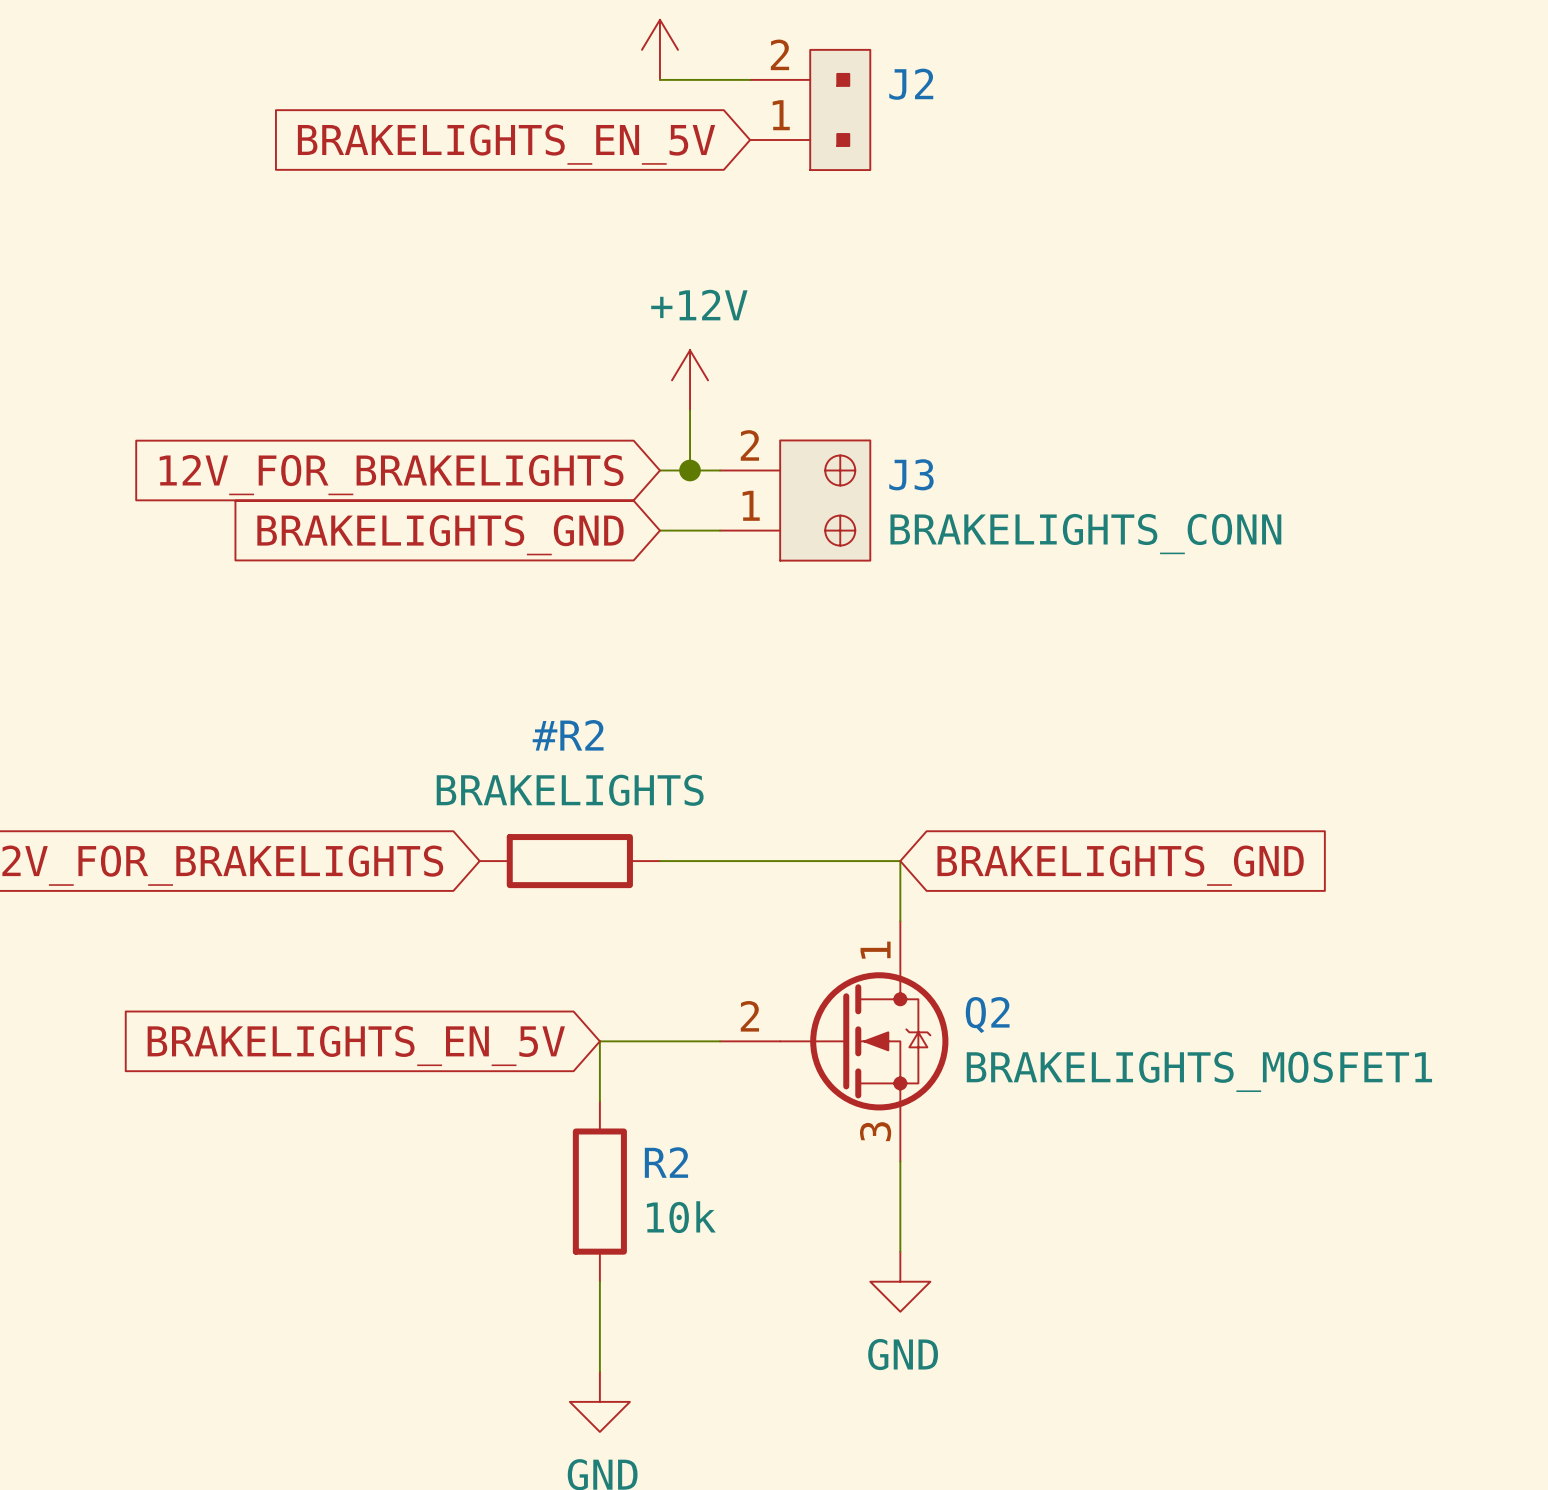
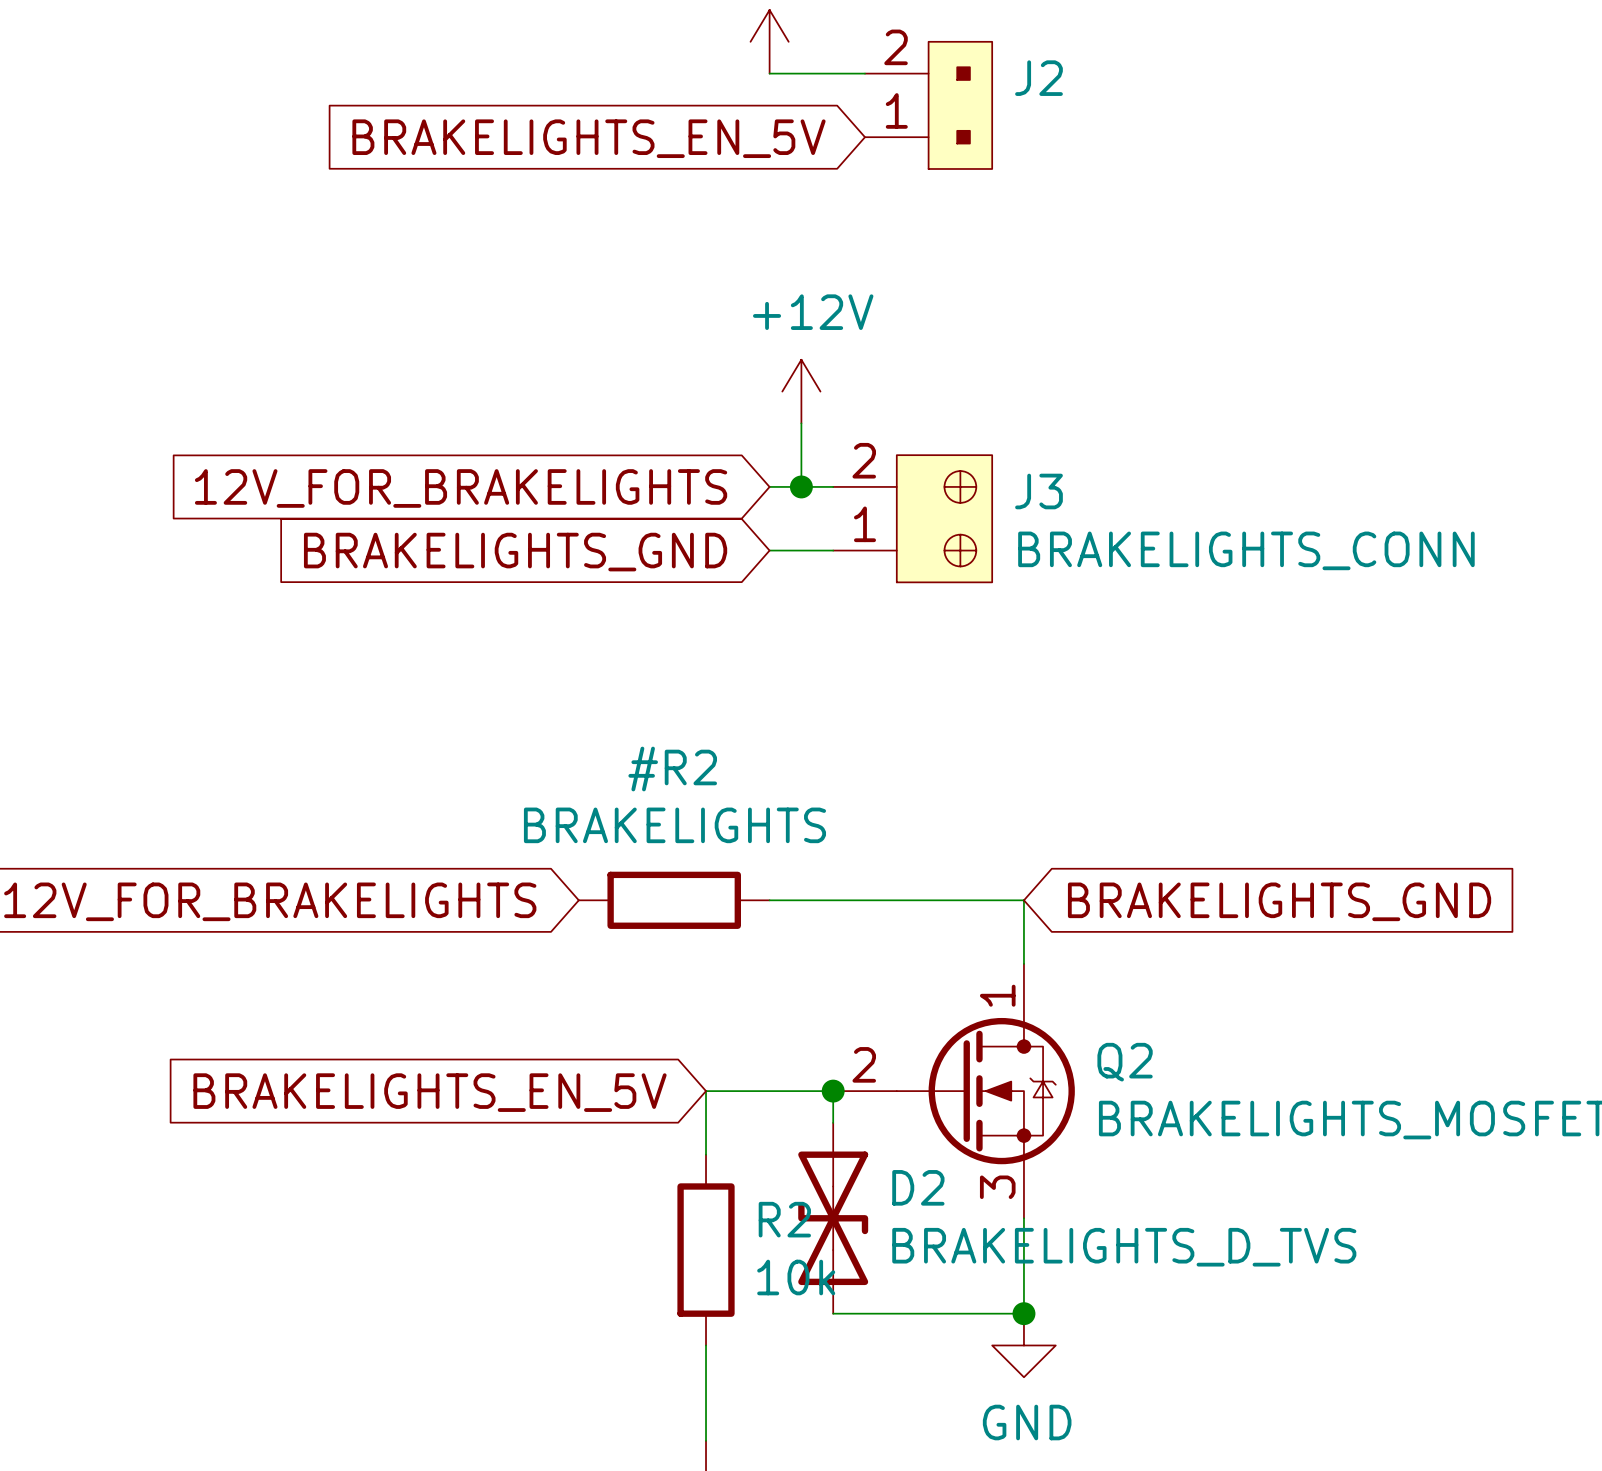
wire: none -> (833, 1091) (833, 1122)
junction: none -> (833, 1091)
D2: none -> BRAKELIGHTS_D_TVS (833, 1218)
wire: none -> (833, 1313) (1023, 1313)
junction: none -> (1023, 1313)

